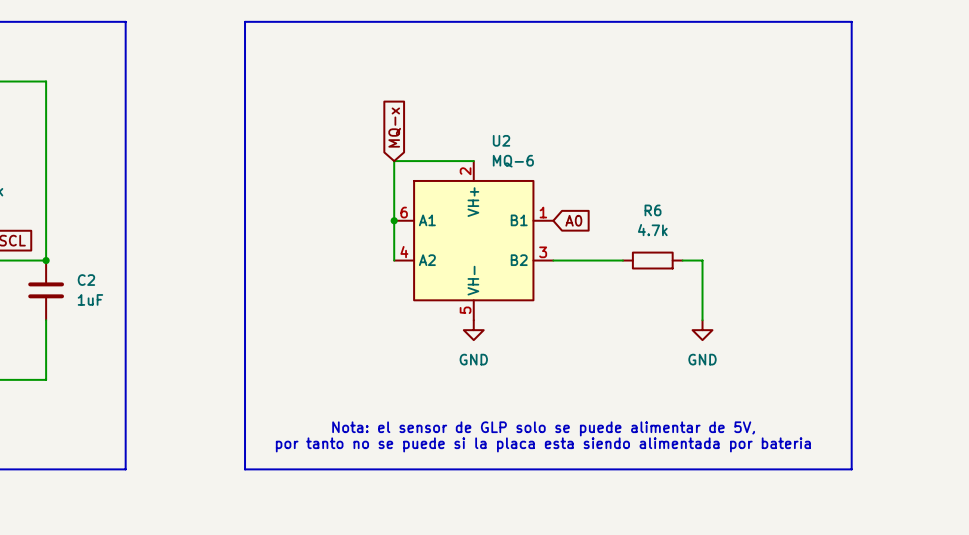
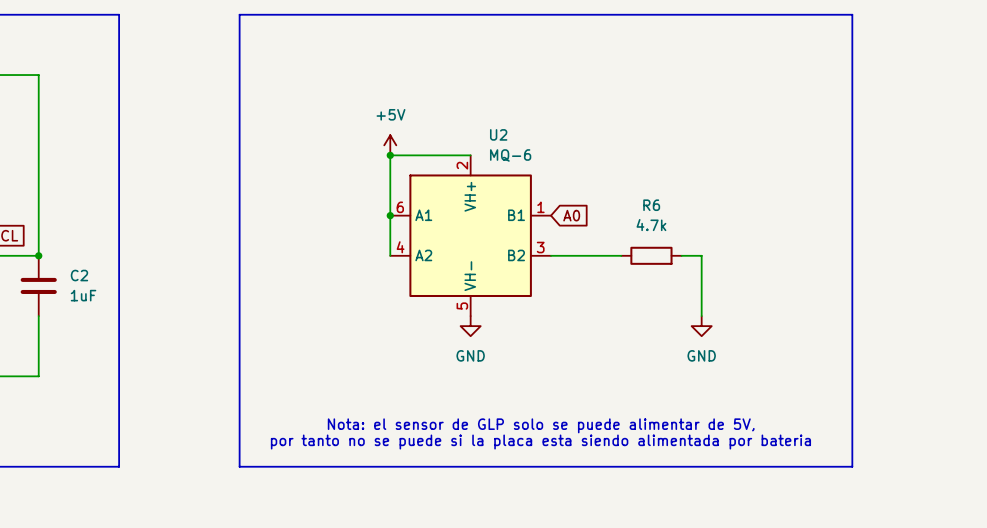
global label: MQ-x (394, 127) -> none
power symbol: none -> +5V (390, 145)
junction: none -> (390, 155)

